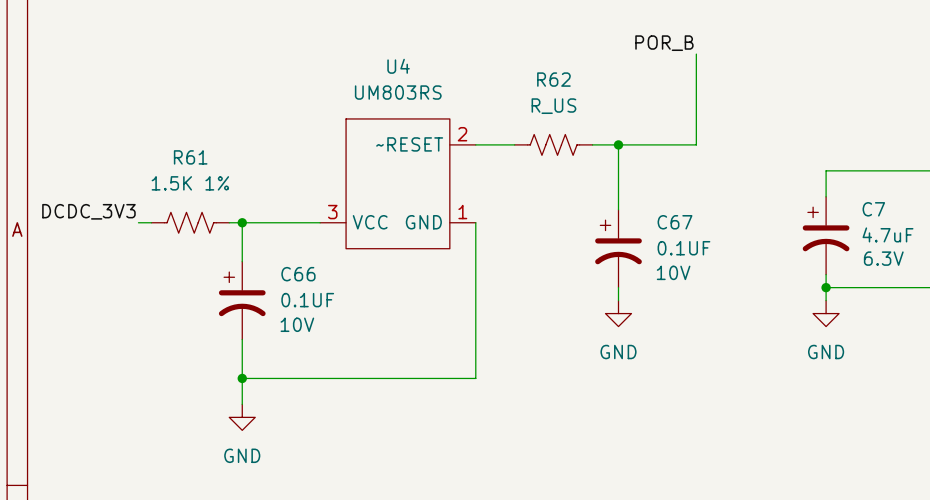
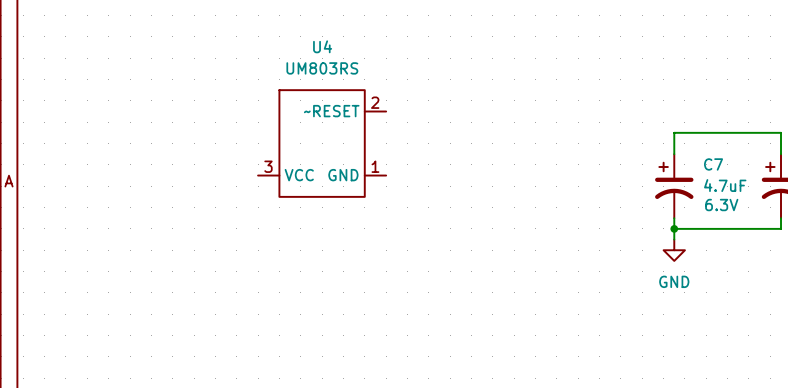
label: POR_B (664, 43) -> none
wire: (696, 54) (696, 144) (592, 144) -> none
wire: (475, 144) (514, 144) -> none
R62: R_US (553, 144) -> none
wire: (618, 144) (618, 209) -> none
junction: (618, 144) -> none
label: DCDC_3V3 (88, 211) -> none
wire: (138, 222) (151, 222) -> none
R61: 1.5K 1% (190, 222) -> none
wire: (229, 222) (320, 222) -> none
wire: (242, 222) (242, 261) -> none
junction: (242, 222) -> none
wire: (475, 222) (475, 378) (242, 378) -> none
C67: 0.1UF (618, 248) -> none
wire: (618, 287) (618, 300) -> none
C66: 0.1UF (242, 300) -> none
power symbol: GND (618, 313) -> none
wire: (242, 339) (242, 404) -> none
junction: (242, 378) -> none
power symbol: GND (242, 417) -> none

